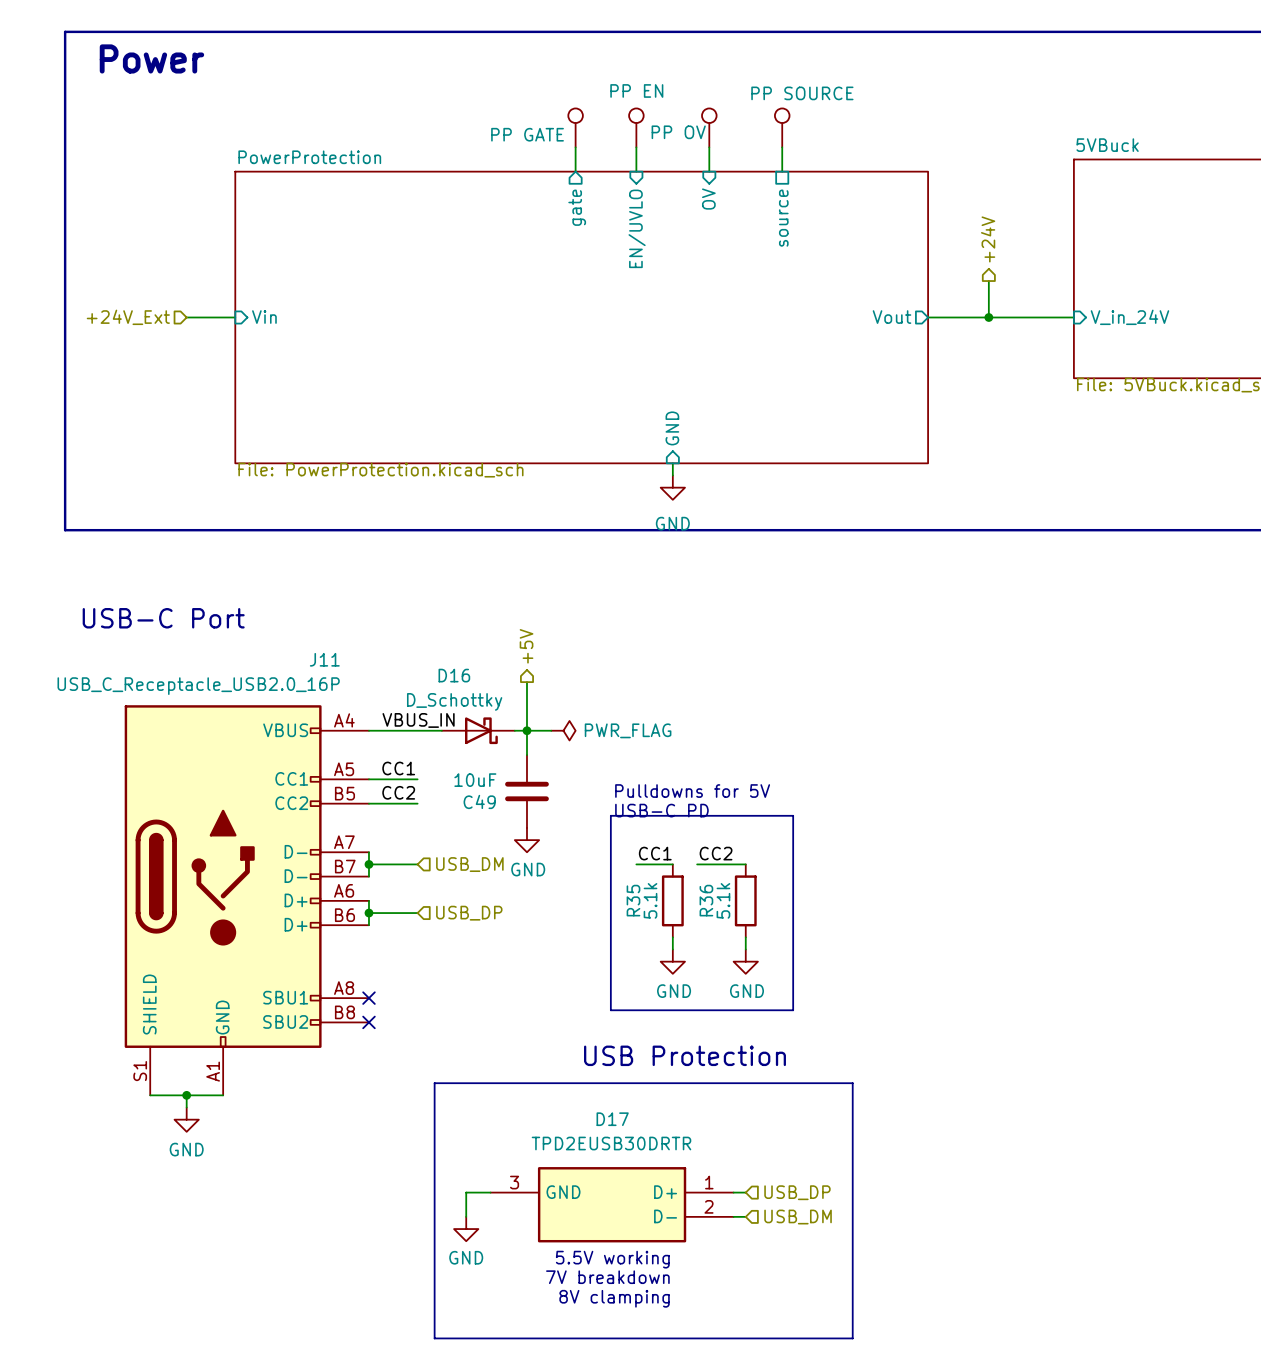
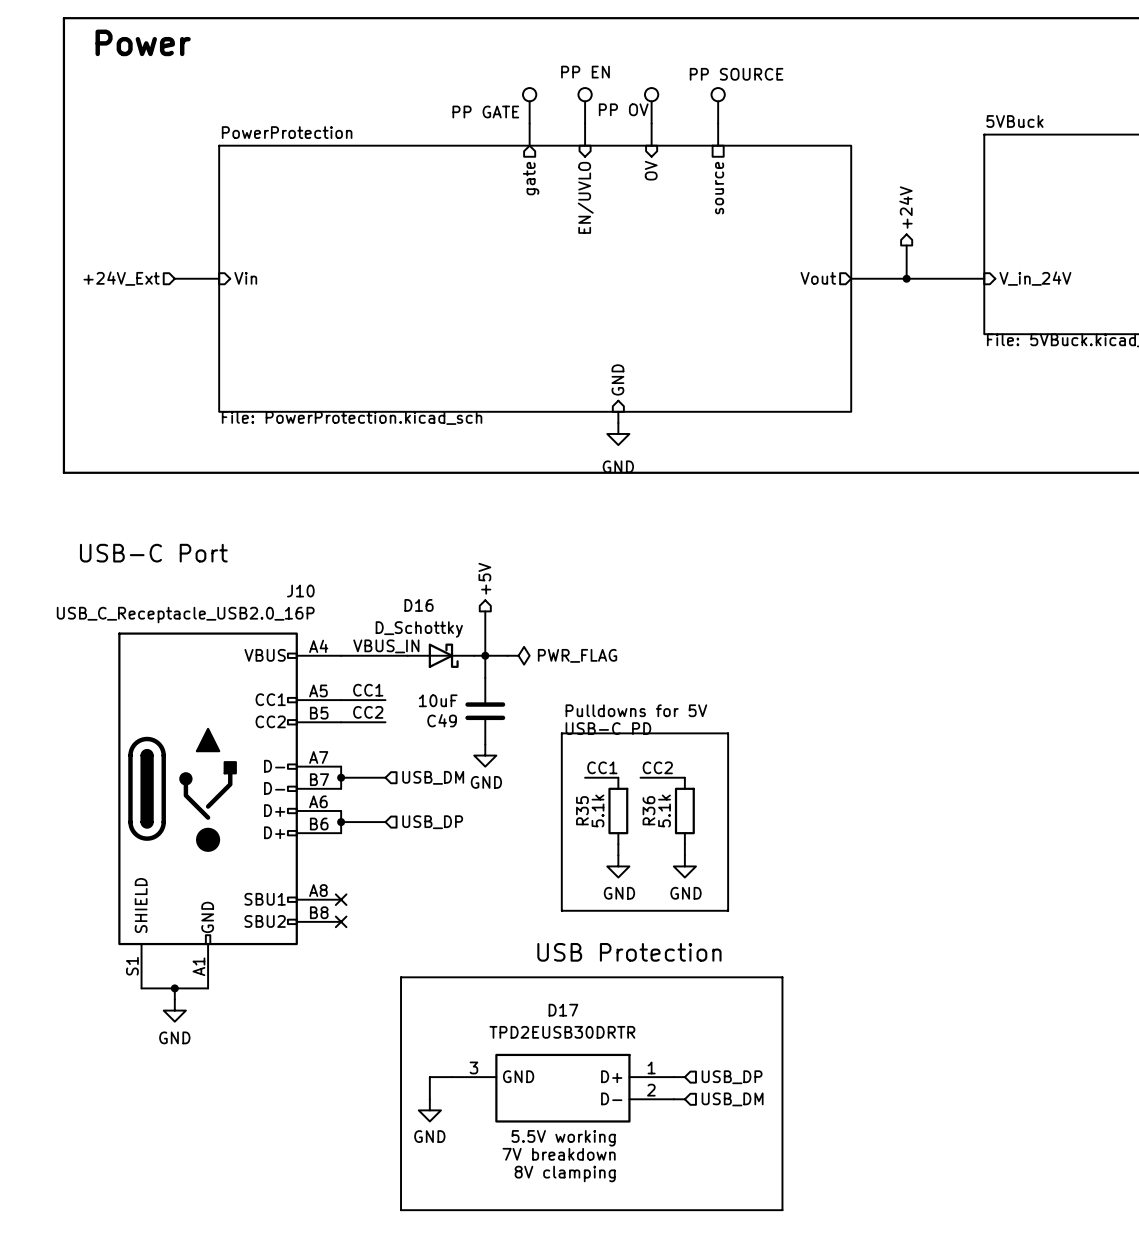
J11 name: J11 (324, 659) -> J10 (300, 591)

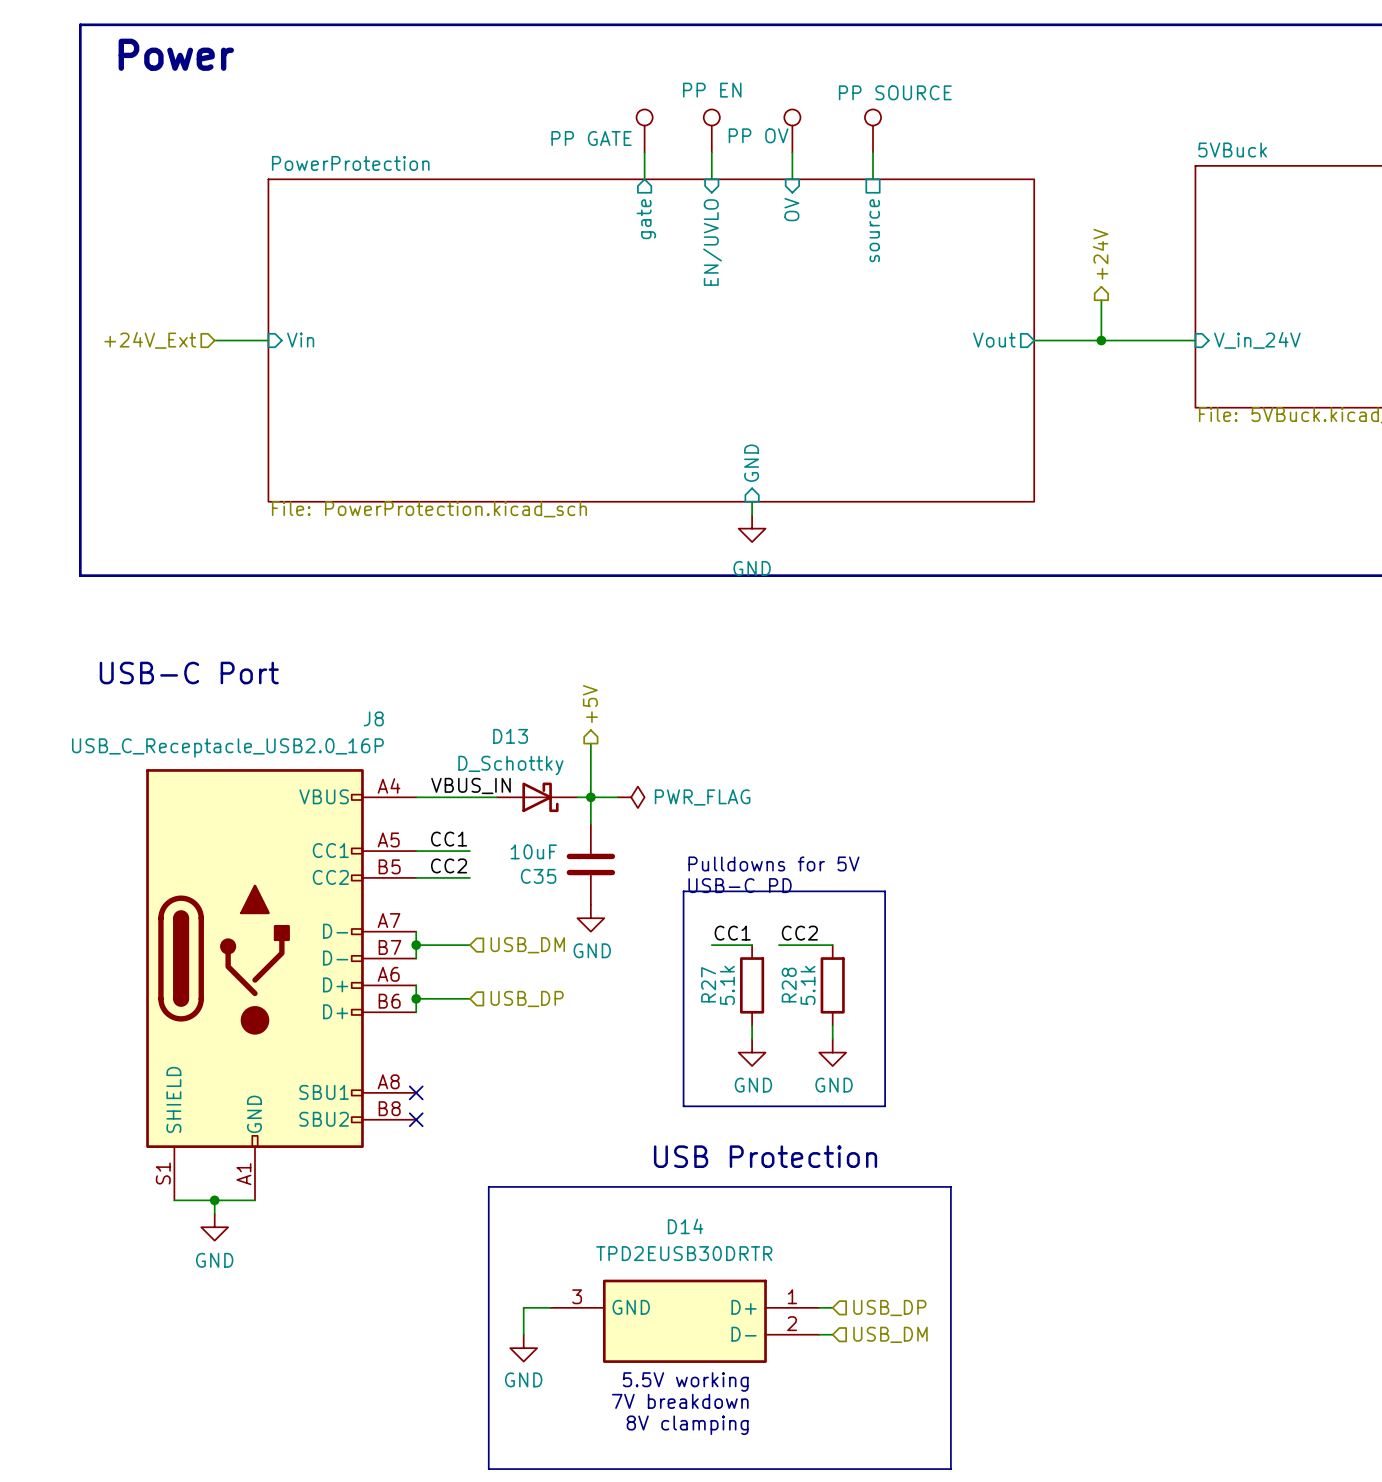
J10 name: J10 (300, 591) -> J8 (373, 718)
D16 name: D16 (419, 605) -> D13 (510, 736)
C49 name: C49 (442, 720) -> C35 (538, 876)
R35 name: R35 (582, 810) -> R27 (708, 984)
R36 name: R36 (648, 810) -> R28 (789, 985)
D17 name: D17 (563, 1010) -> D14 (685, 1226)

